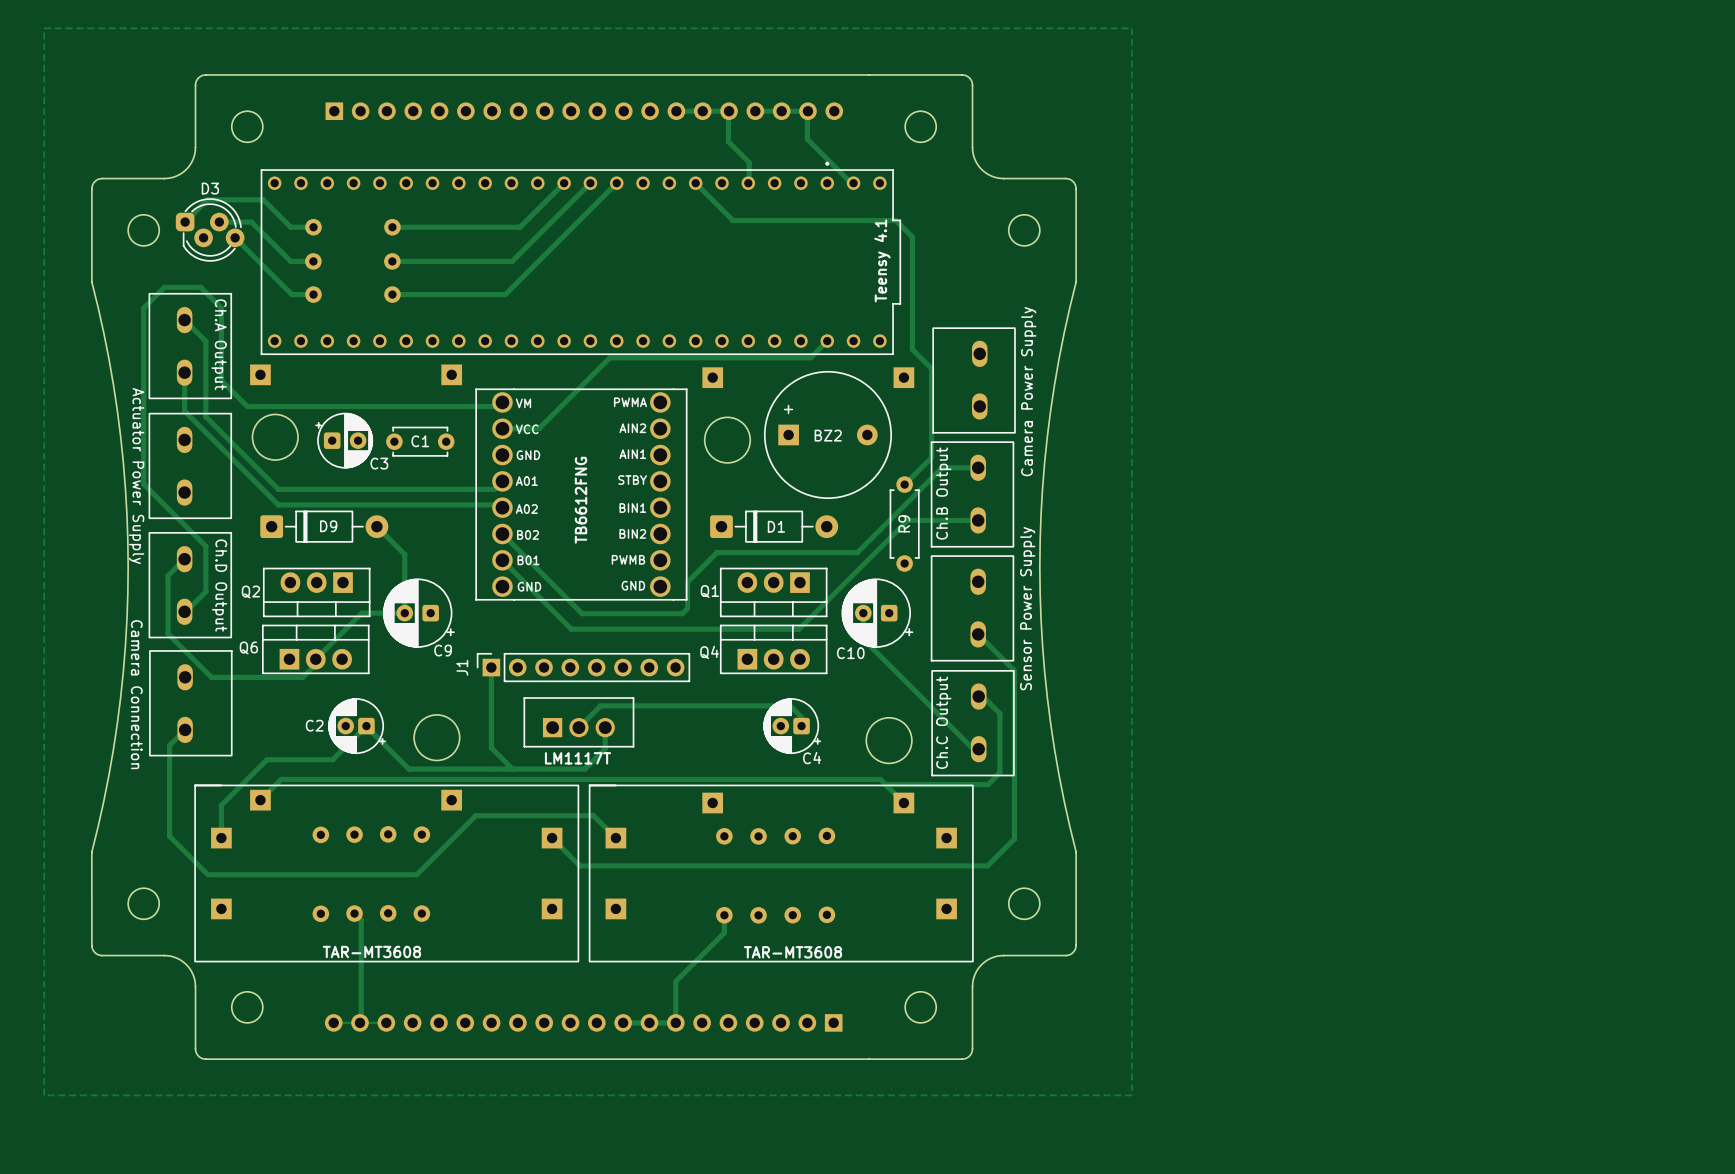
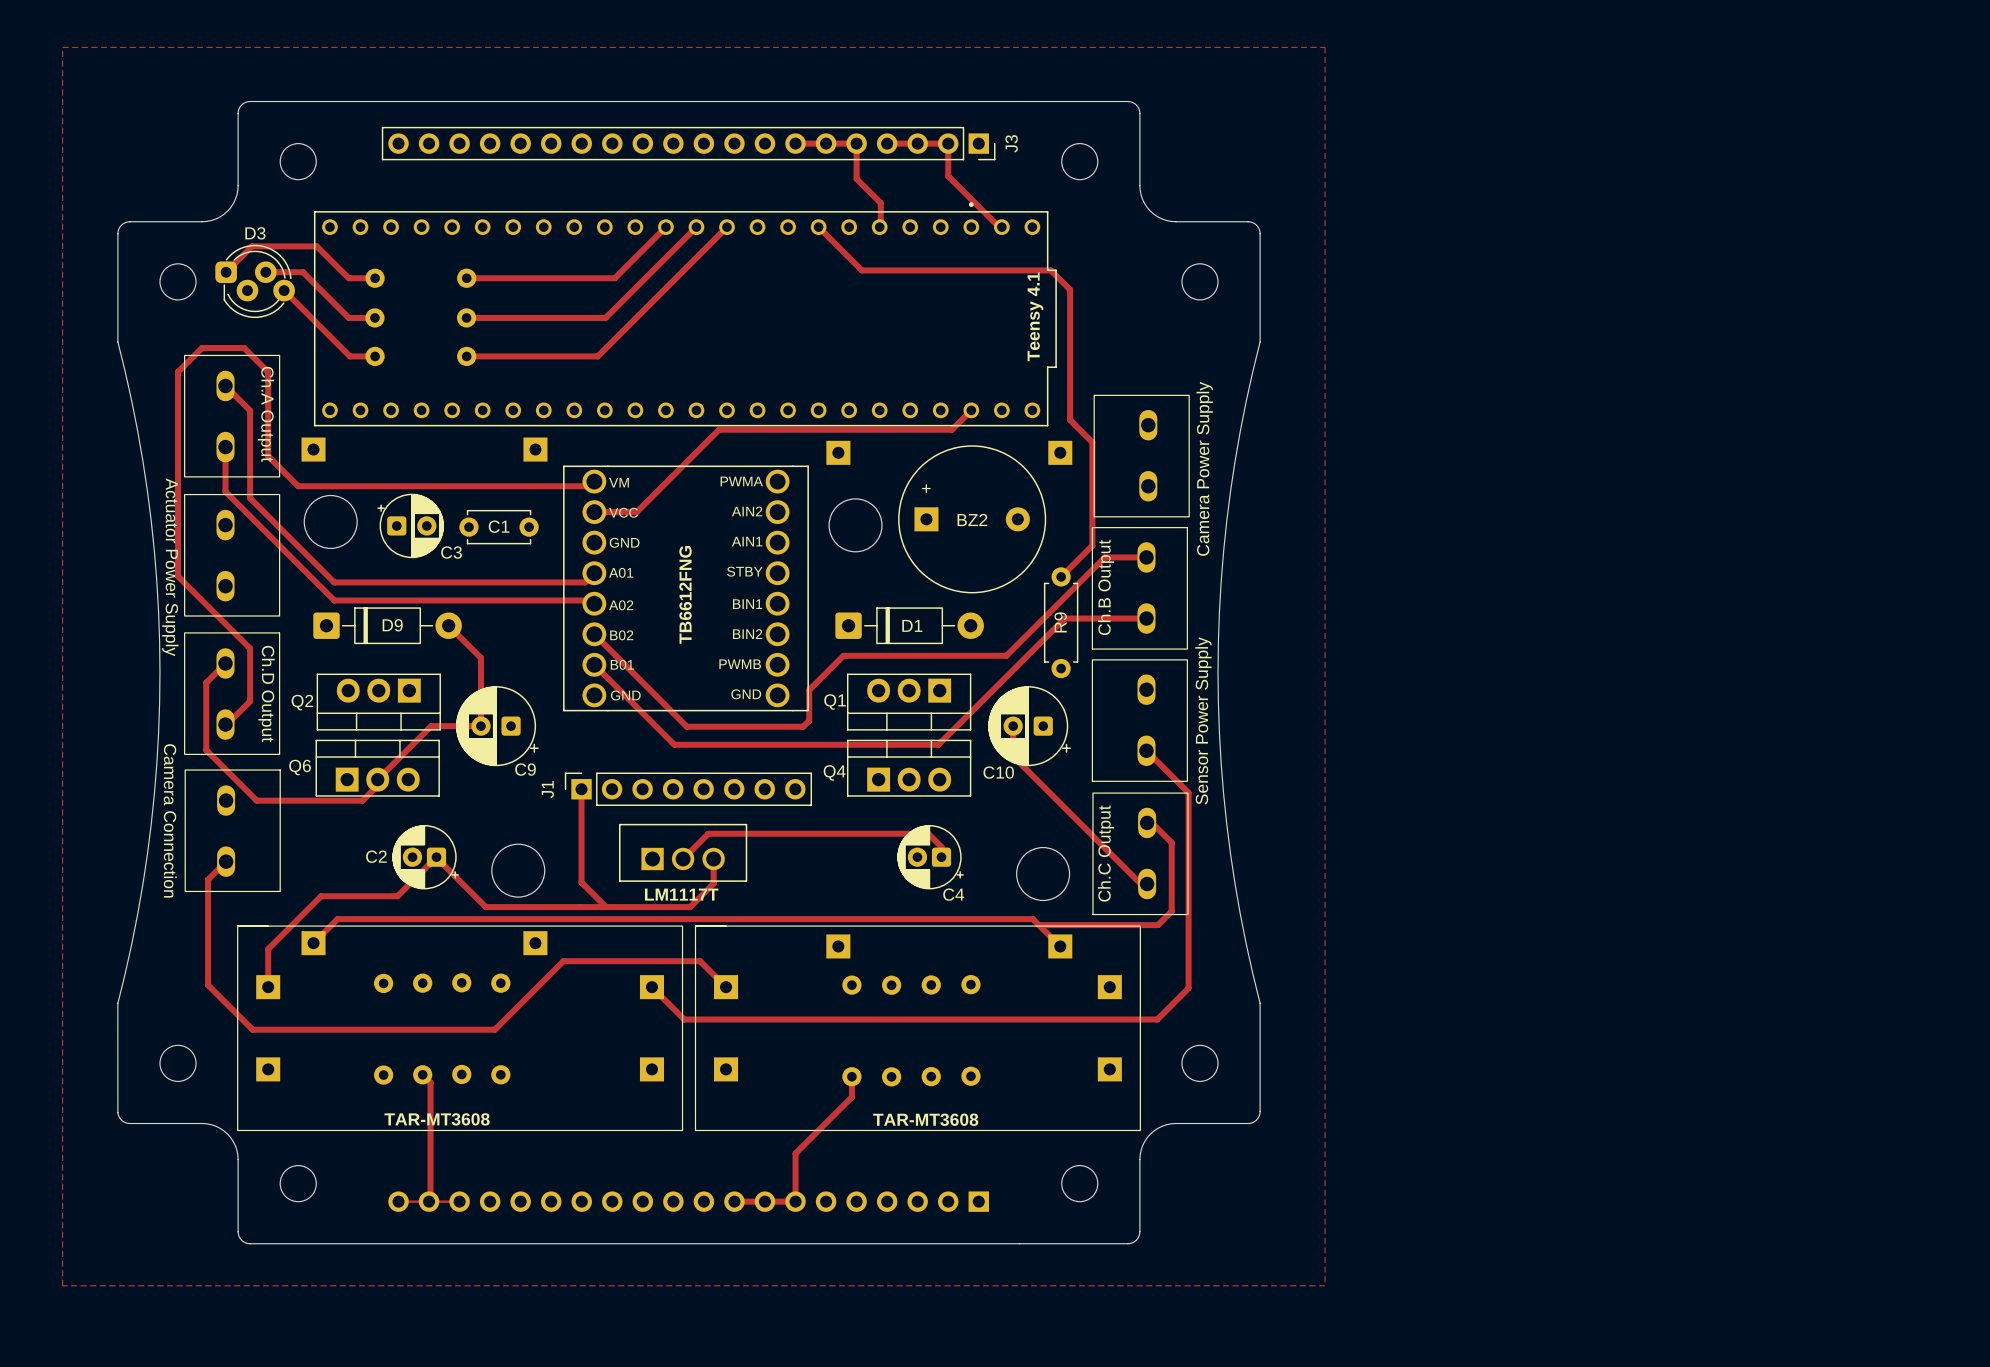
J3 side: bottom (584, 111) -> top (688, 143)

